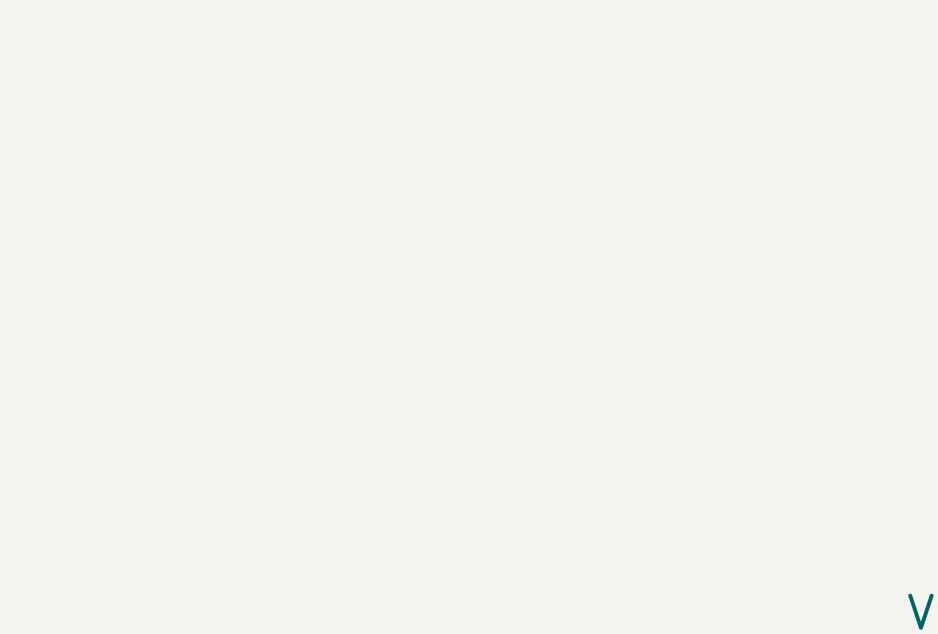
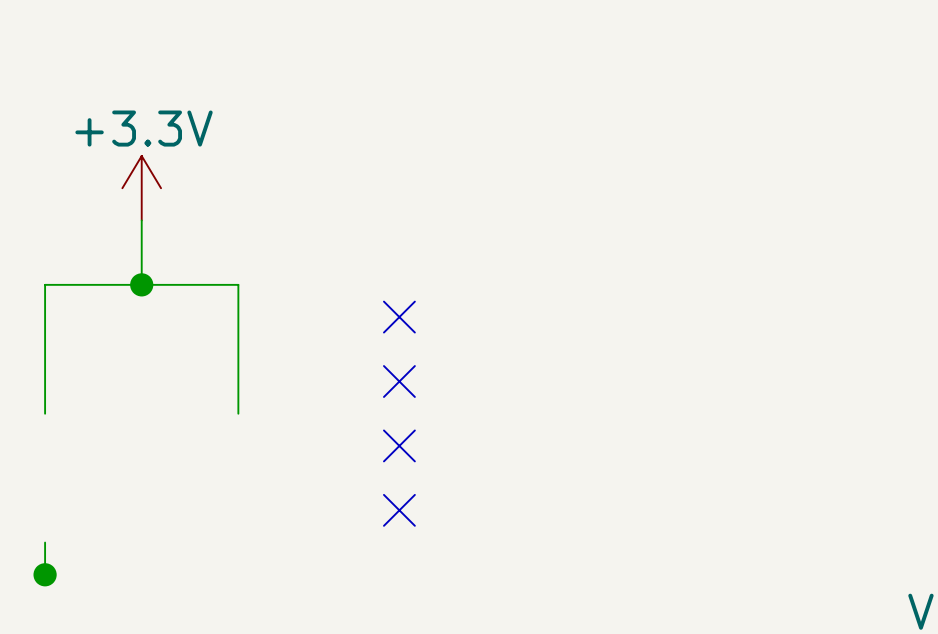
power symbol: none -> +3.3V (141, 188)
wire: none -> (141, 220) (141, 284)
junction: none -> (141, 284)
no-connect mark: none -> (399, 317)
no-connect mark: none -> (399, 381)
wire: none -> (45, 413) (45, 284) (238, 284) (238, 413)
no-connect mark: none -> (399, 445)
no-connect mark: none -> (399, 510)
wire: none -> (45, 542) (45, 574)
junction: none -> (45, 574)

